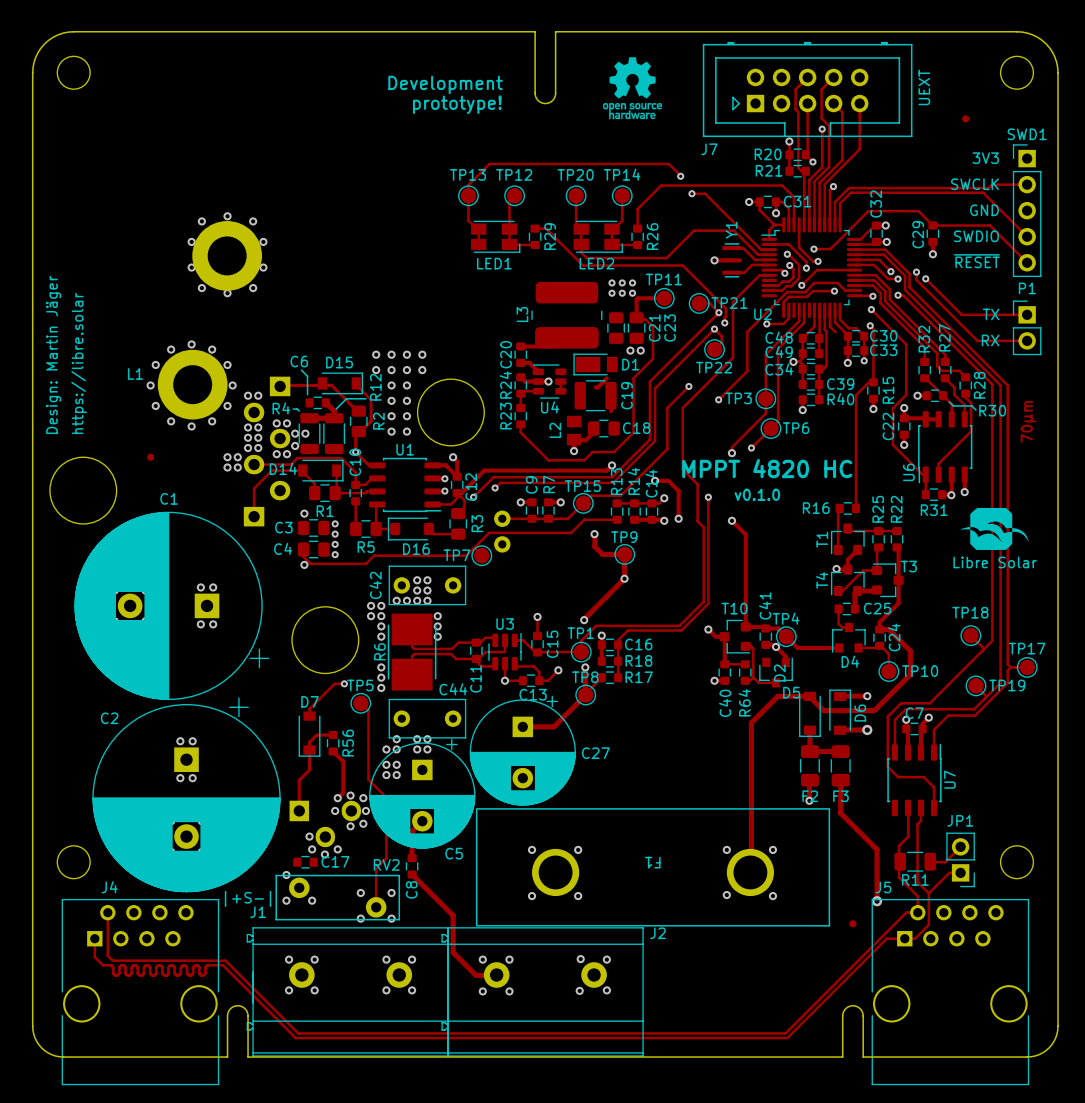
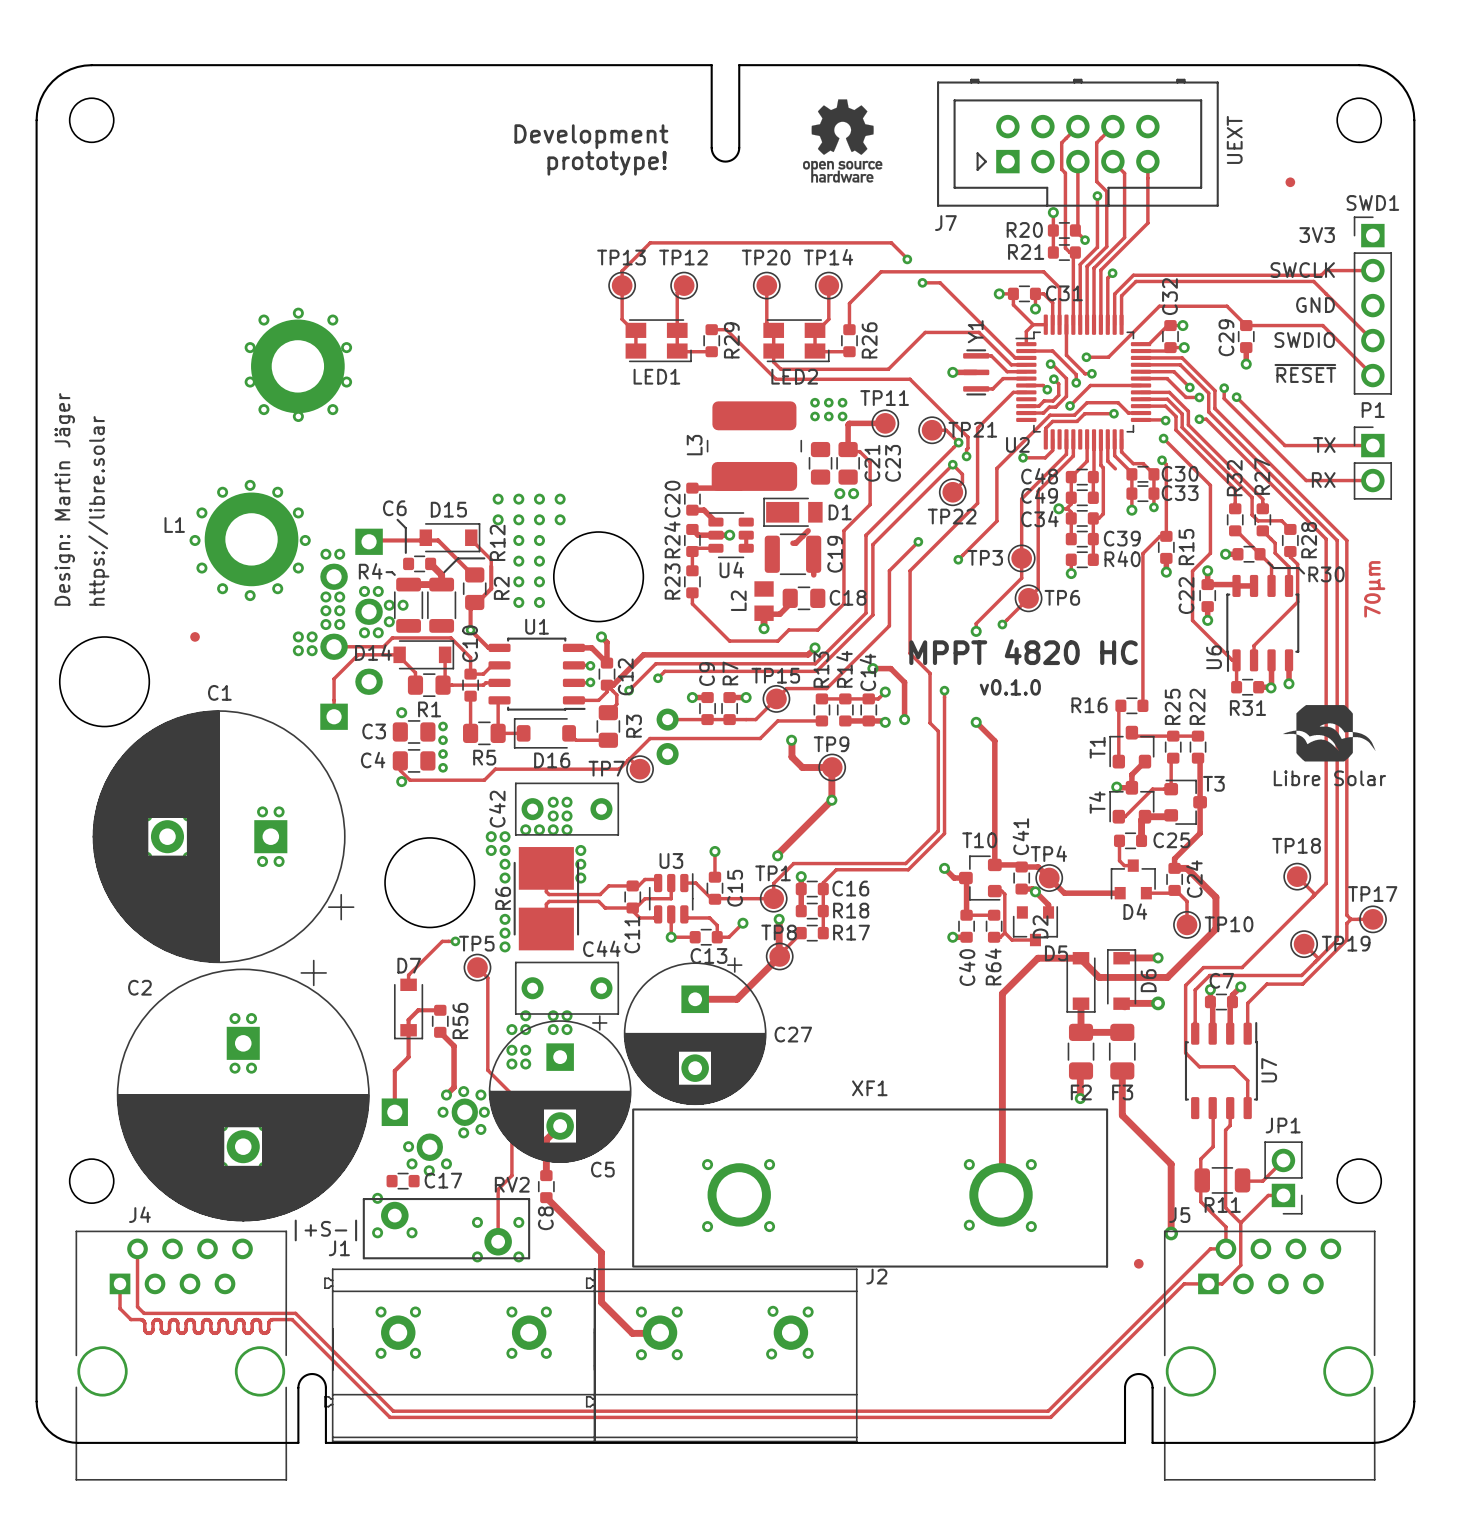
F1 name: F1 (652, 862) -> XF1 (869, 1088)

